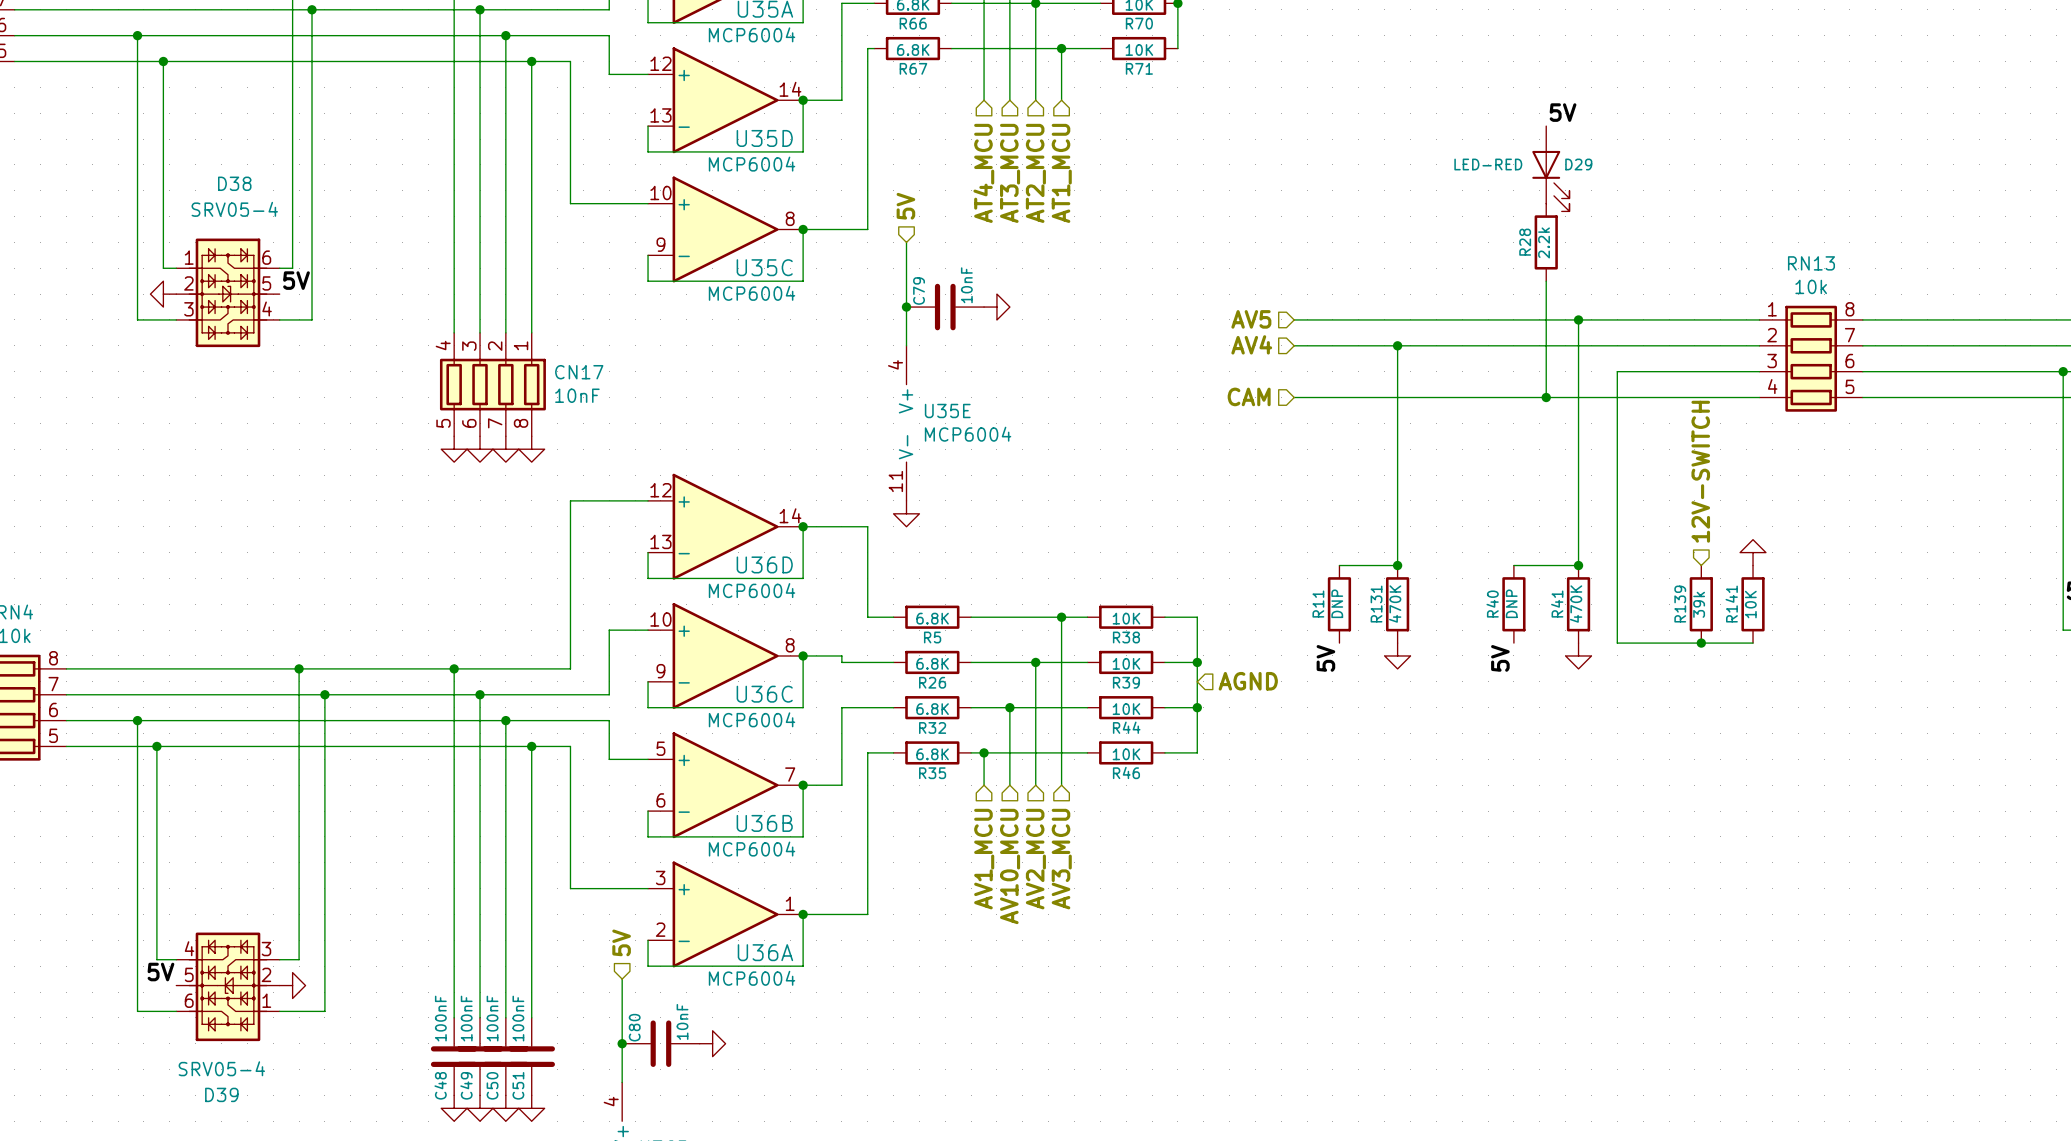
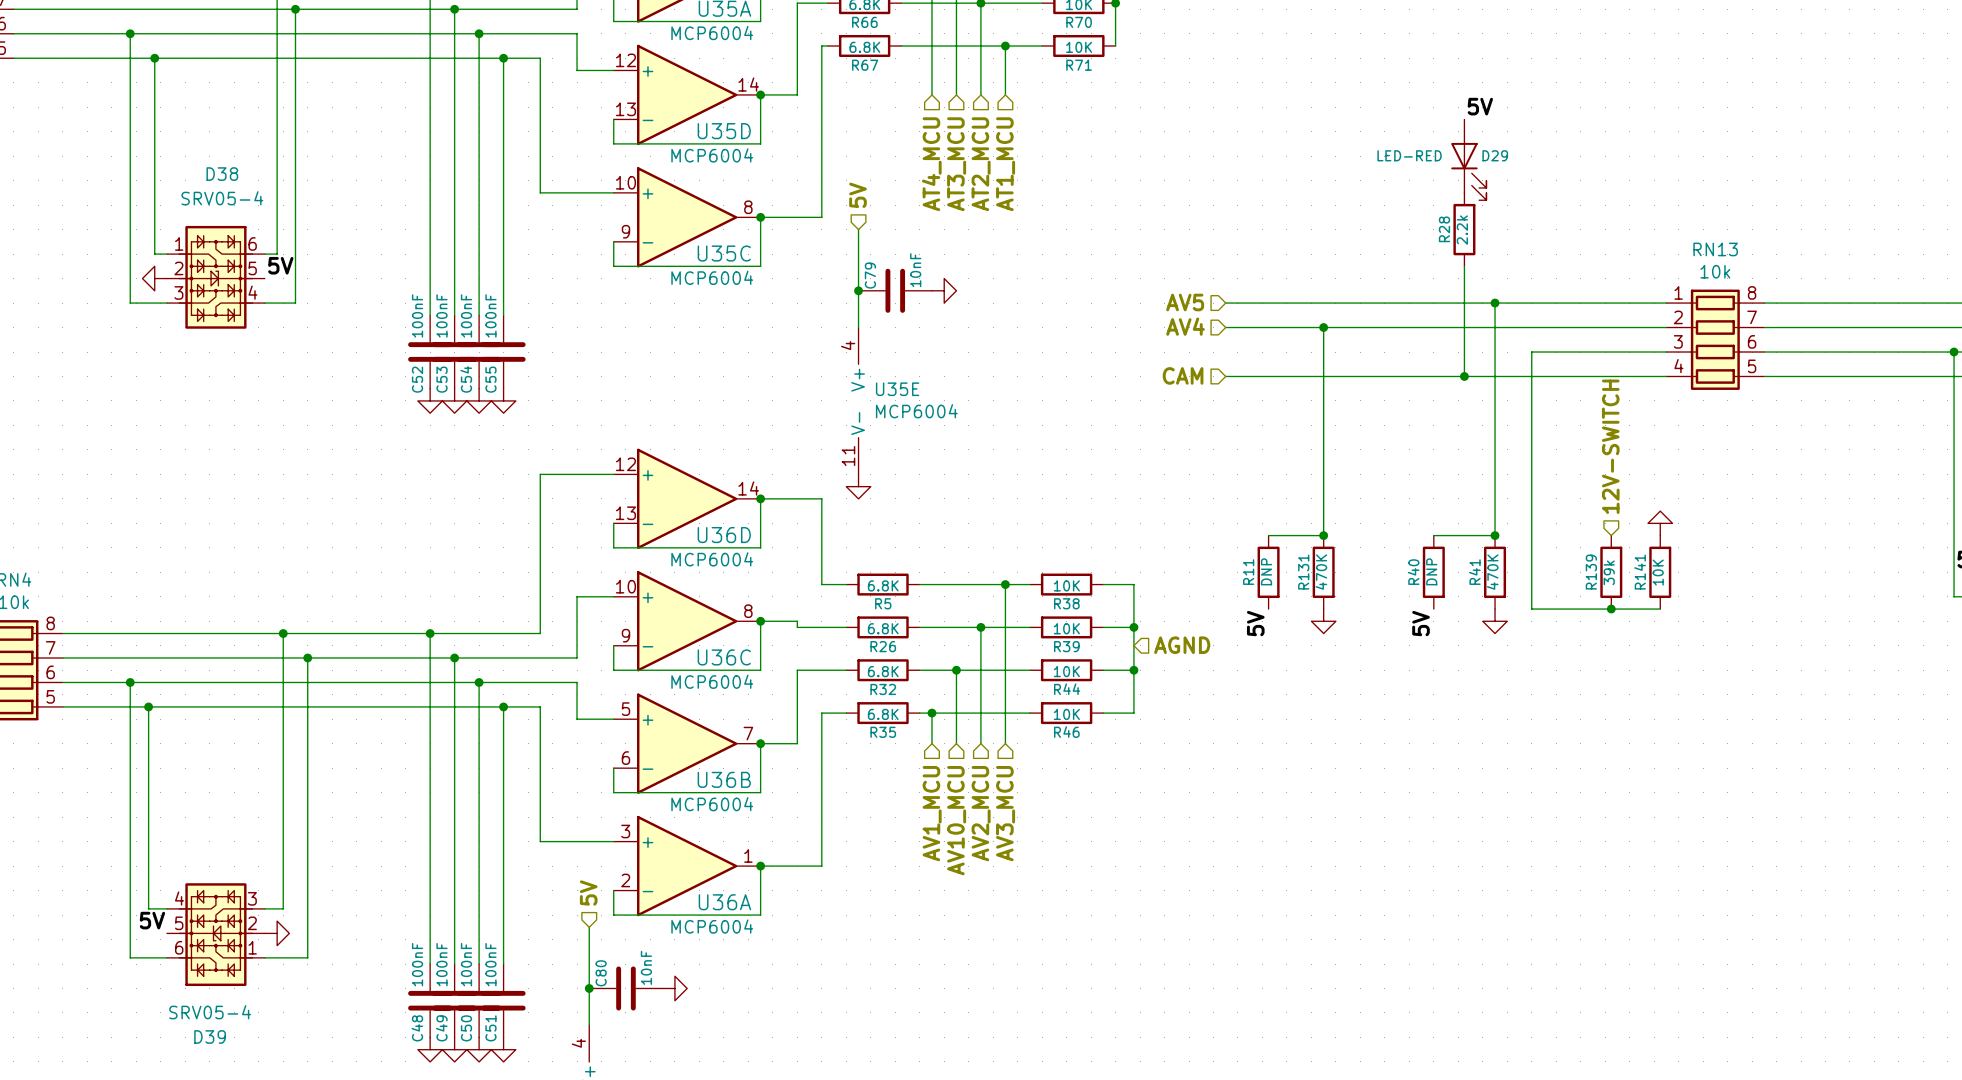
C52: none -> 100nF (430, 352)
C53: none -> 100nF (454, 352)
C54: none -> 100nF (479, 352)
C55: none -> 100nF (503, 352)
CN17: 10nF (492, 384) -> none
power symbol: none -> (430, 400)
power symbol: none -> (454, 400)
power symbol: none -> (479, 400)
power symbol: none -> (503, 400)
power symbol: (454, 449) -> none
power symbol: (480, 449) -> none
power symbol: (505, 449) -> none
power symbol: (531, 449) -> none

